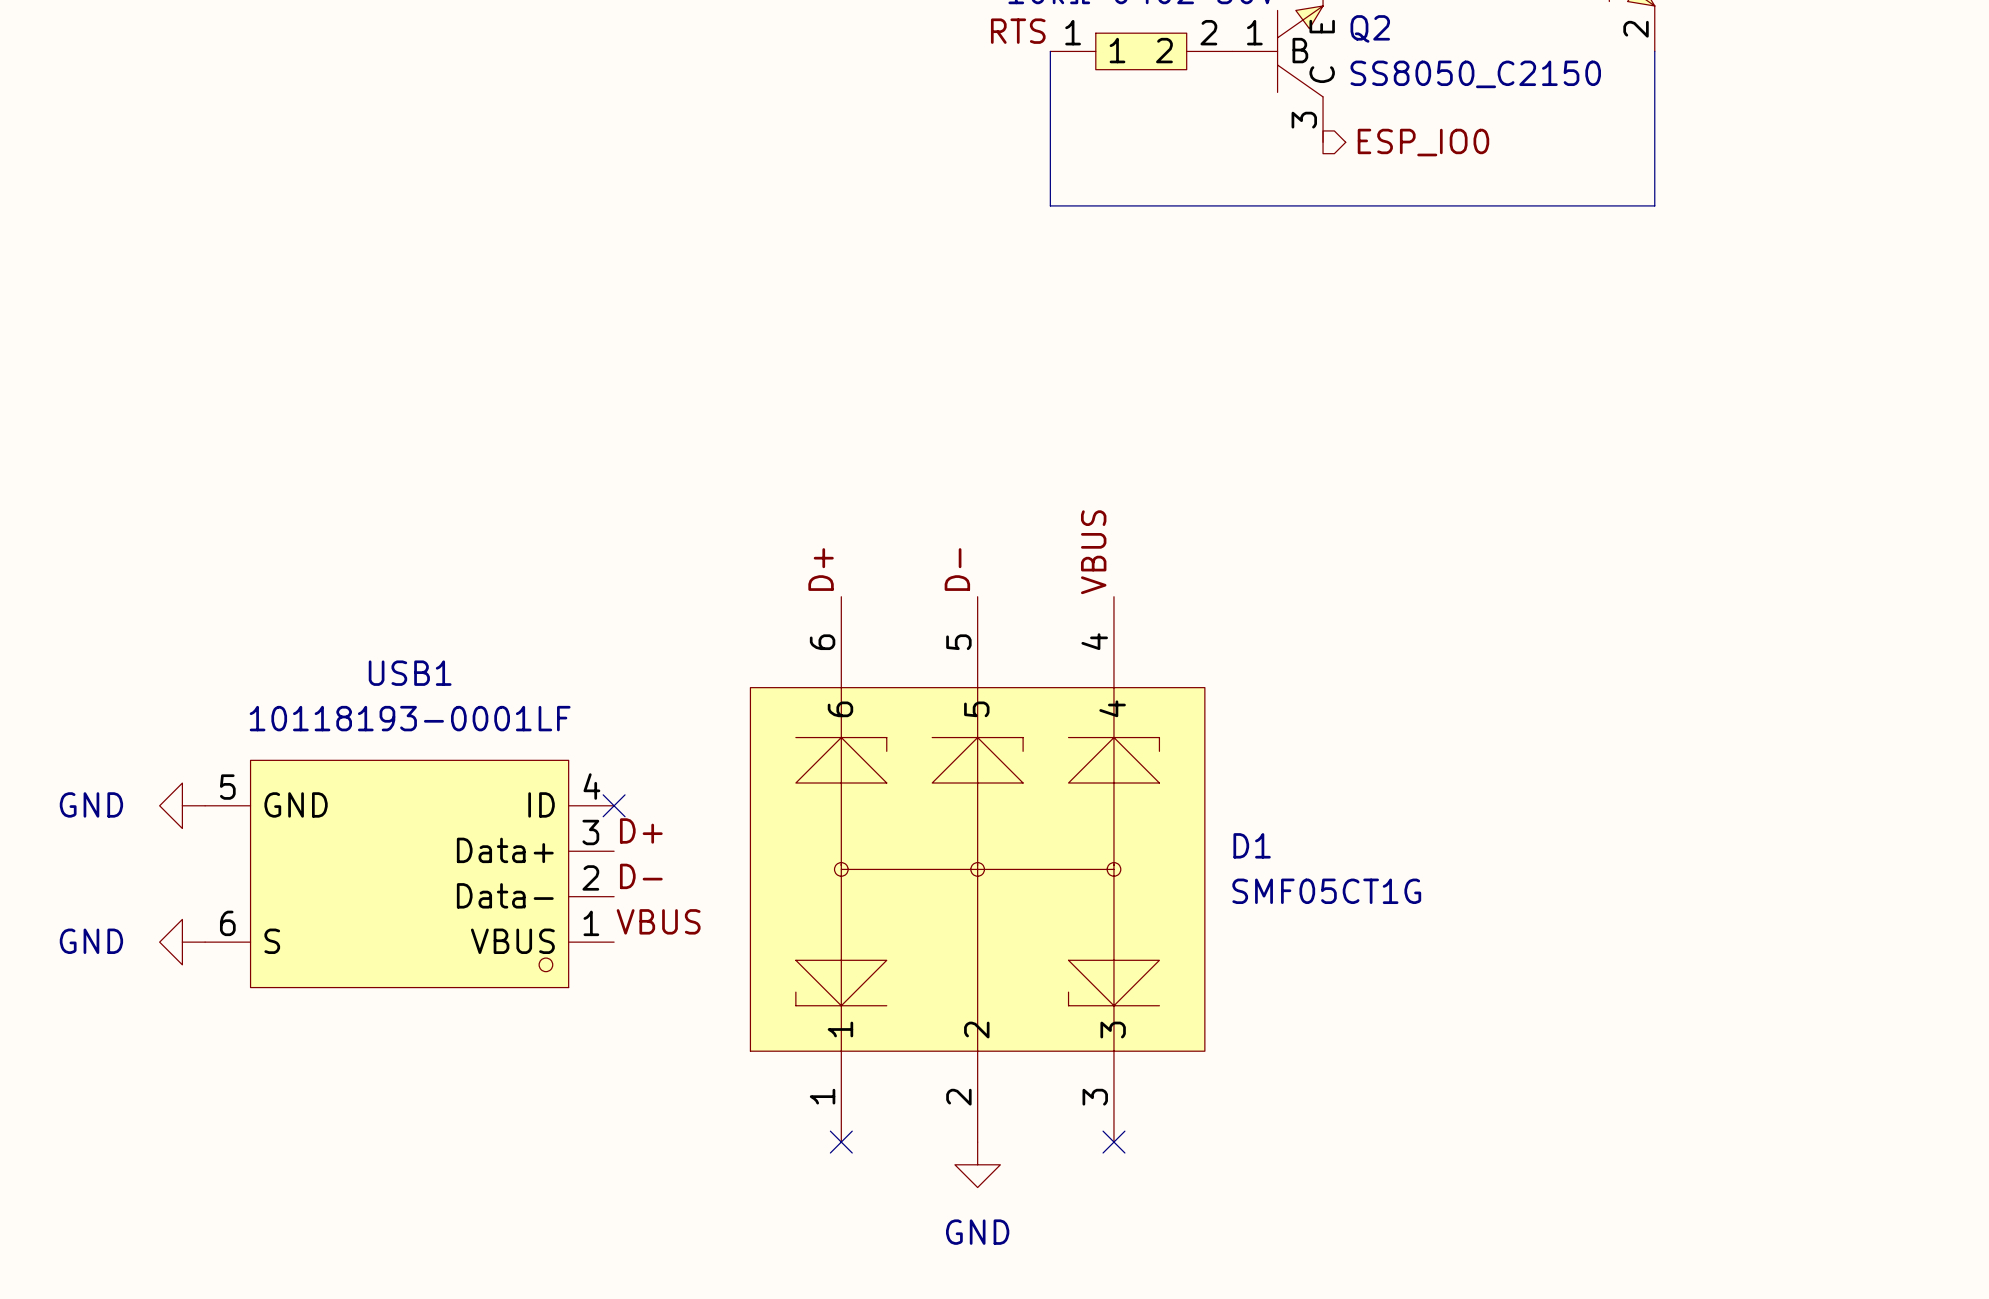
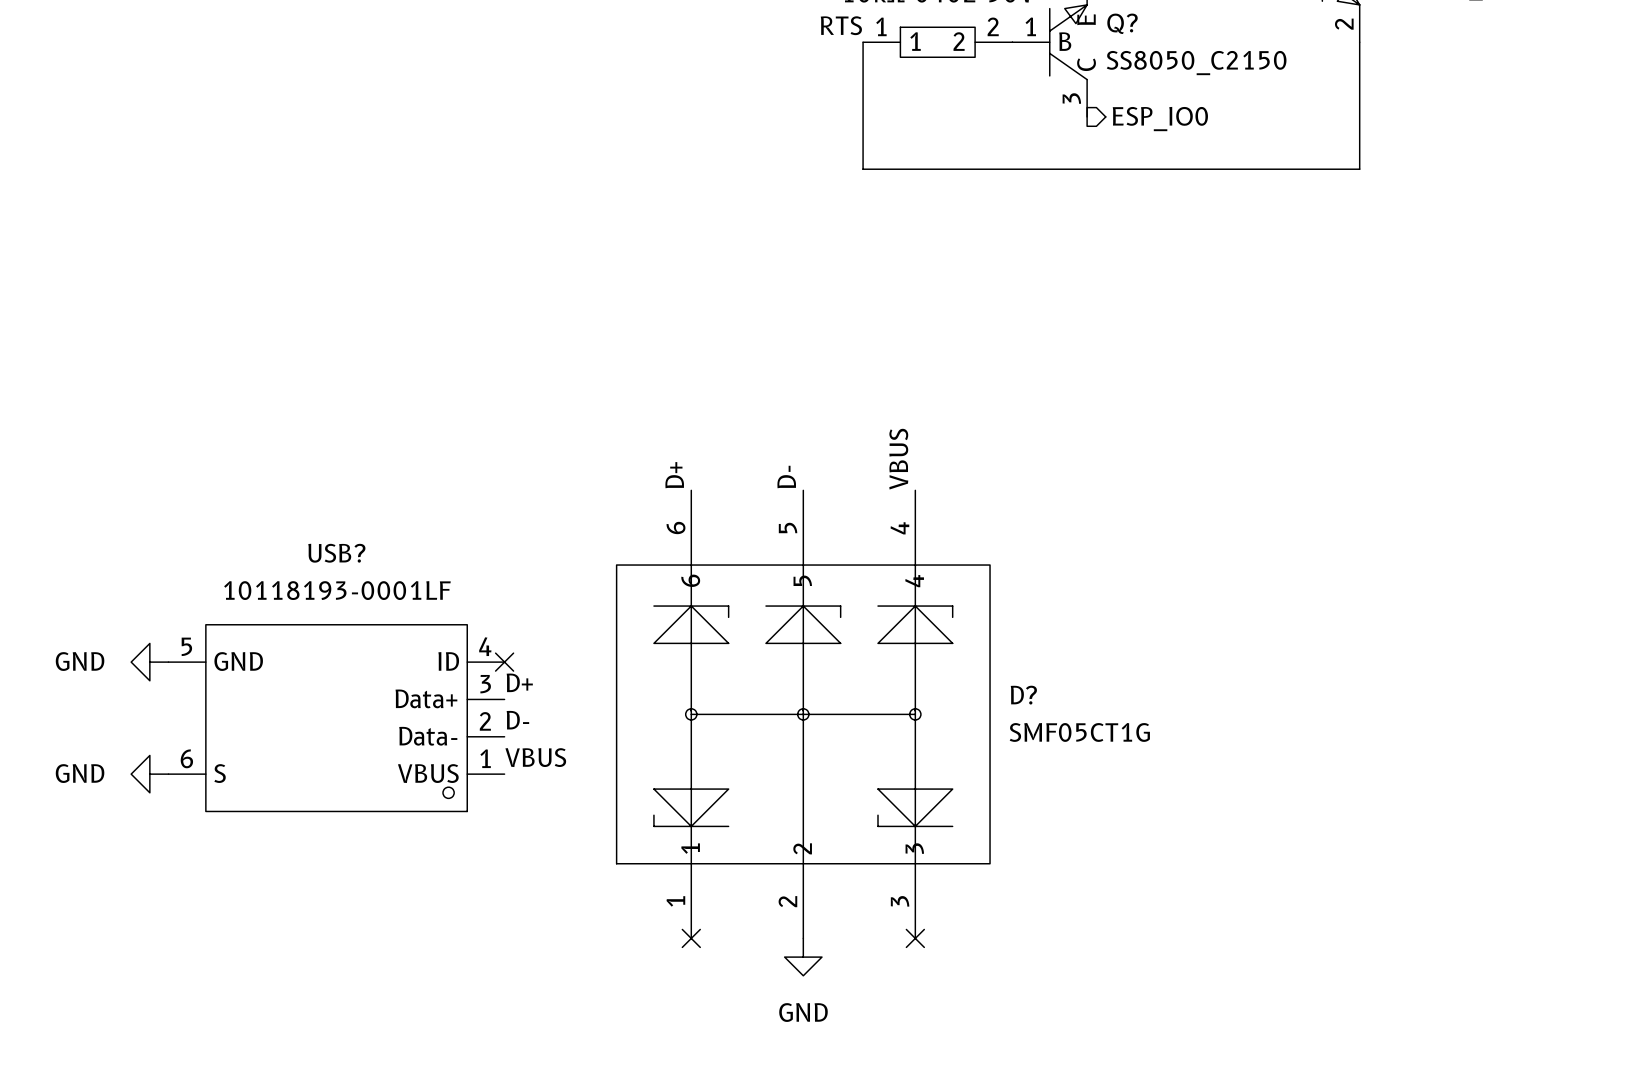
Q2 name: Q2 (1370, 28) -> Q? (1122, 23)
USB1 name: USB1 (410, 673) -> USB? (336, 553)
D1 name: D1 (1252, 845) -> D? (1023, 695)

